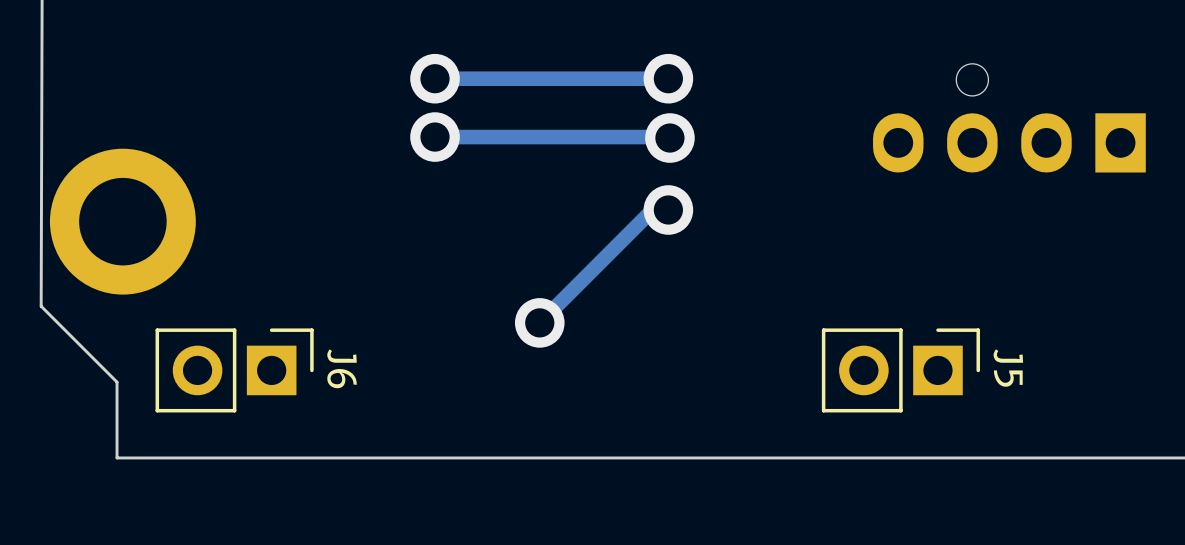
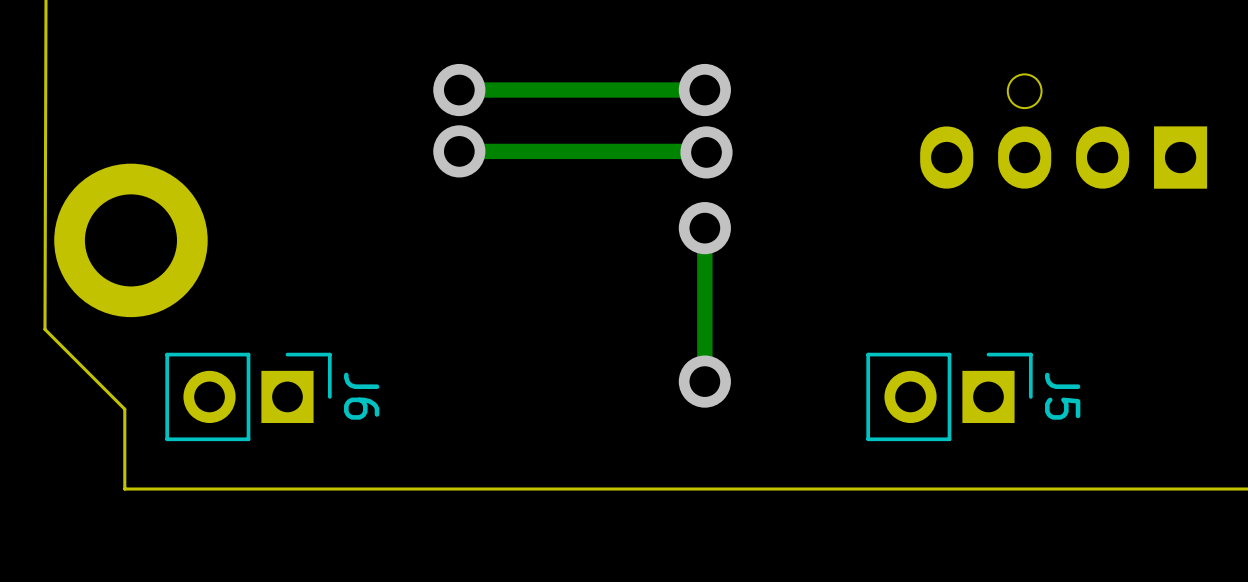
track: (668, 209) (652, 209) (539, 322) -> (704, 228) (704, 381)
via position: (539, 322) -> (704, 381)

